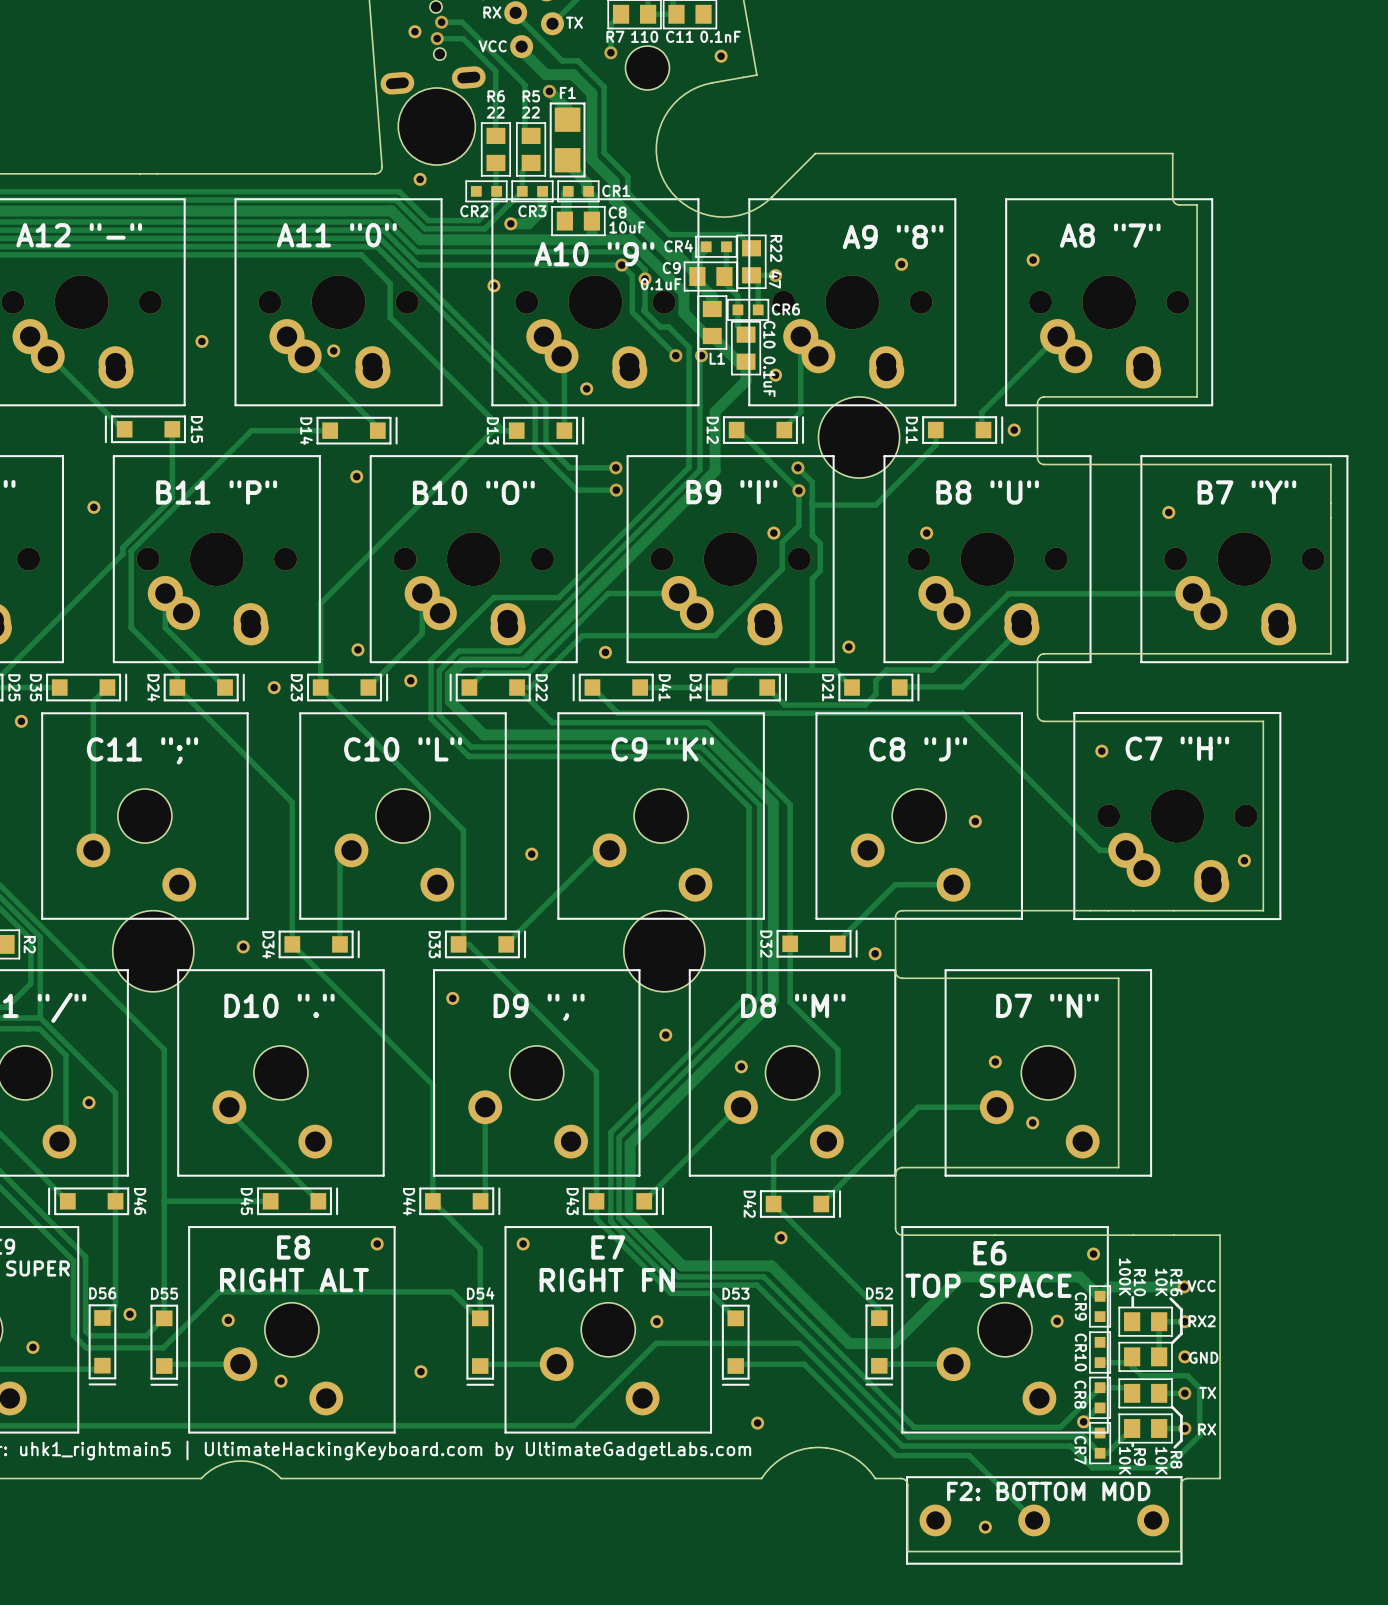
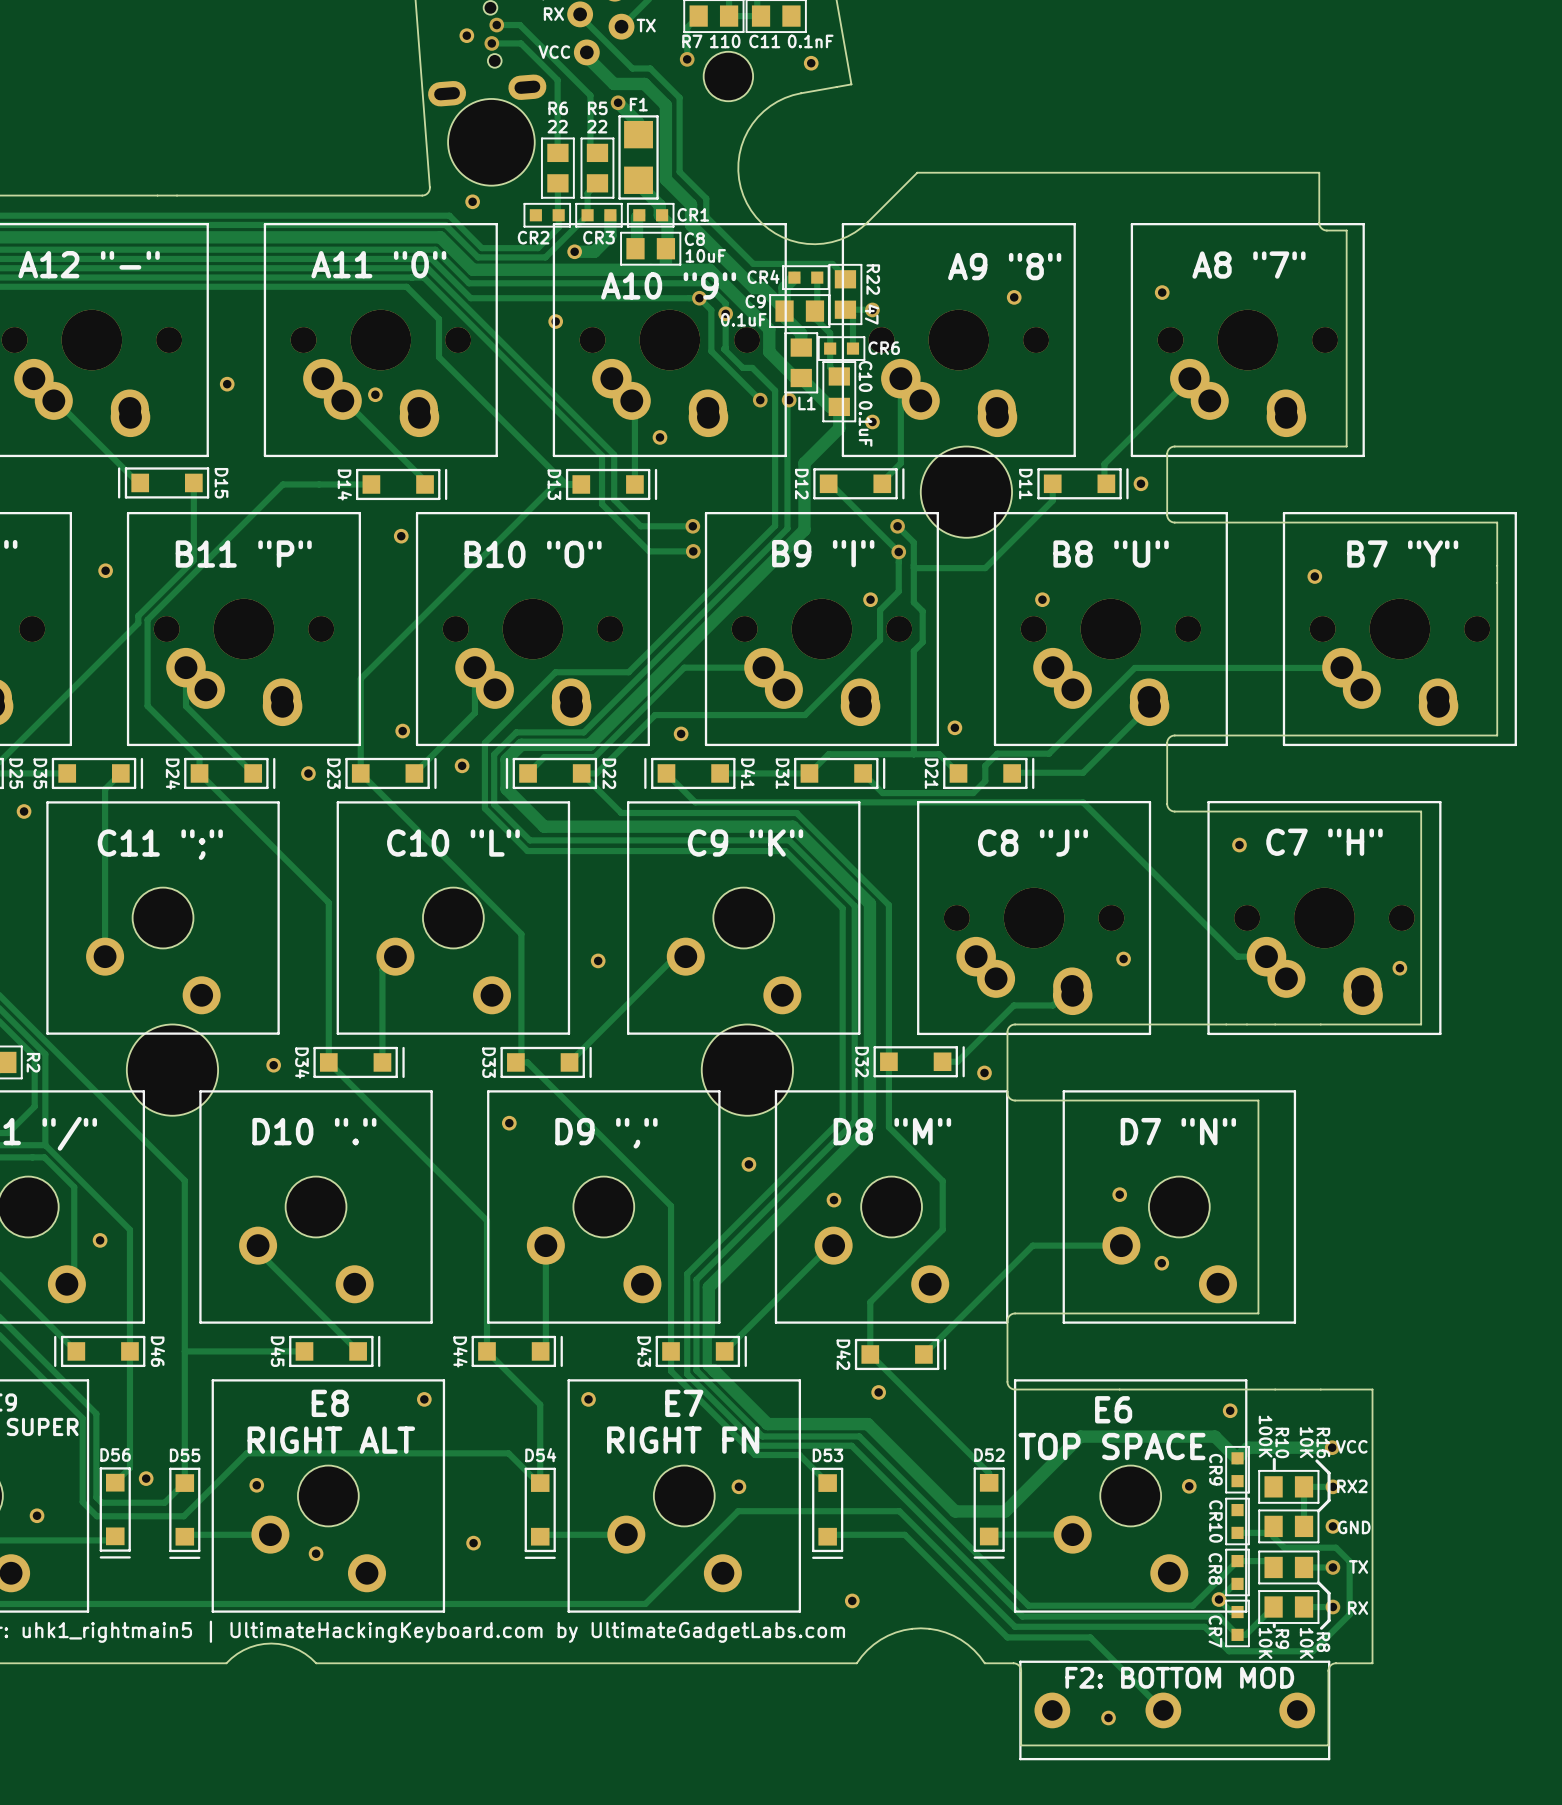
part footprint: [815, 712, 1023, 920] -> [917, 800, 1152, 1036]
part position: (975, 821) -> (1123, 958)
track: none -> (1072, 986) (1053, 1005) (1013, 1005) (957, 1061) (942, 1061)
track: (953, 884) (895, 884) (836, 943) -> none

